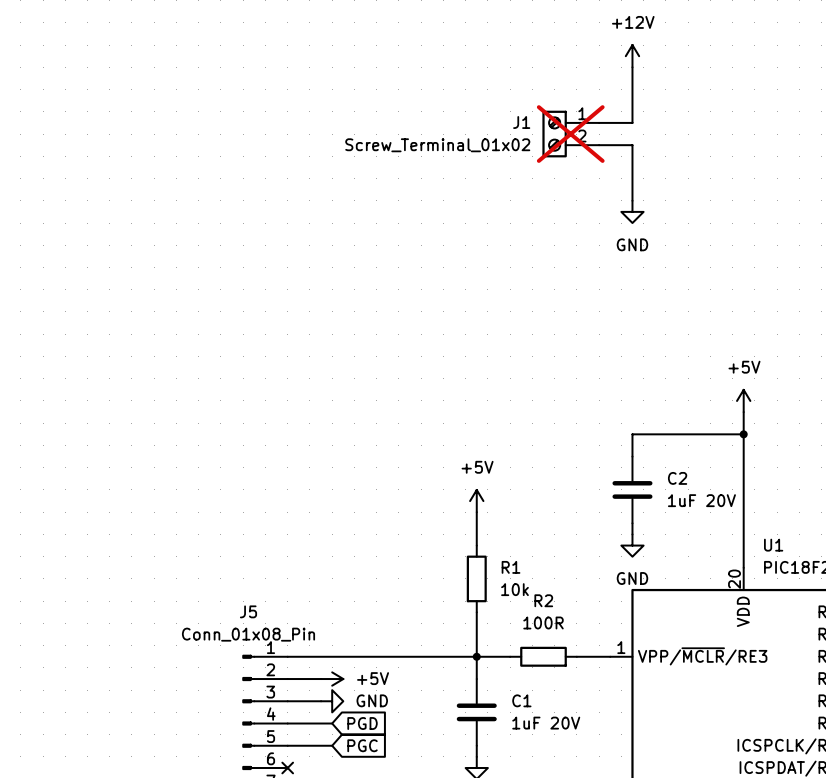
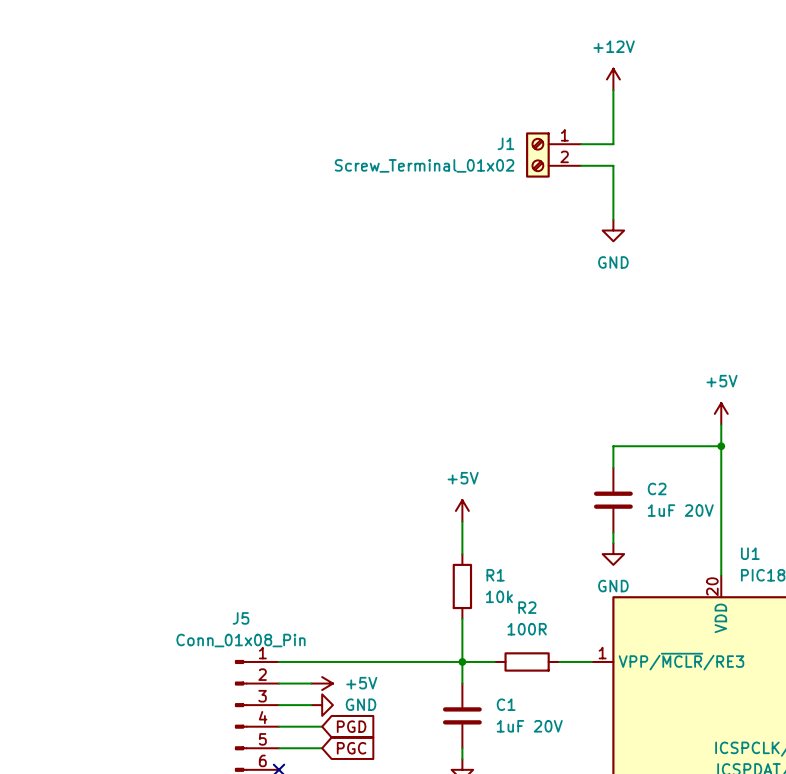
J1 do-not-place cross: (570, 134) -> none

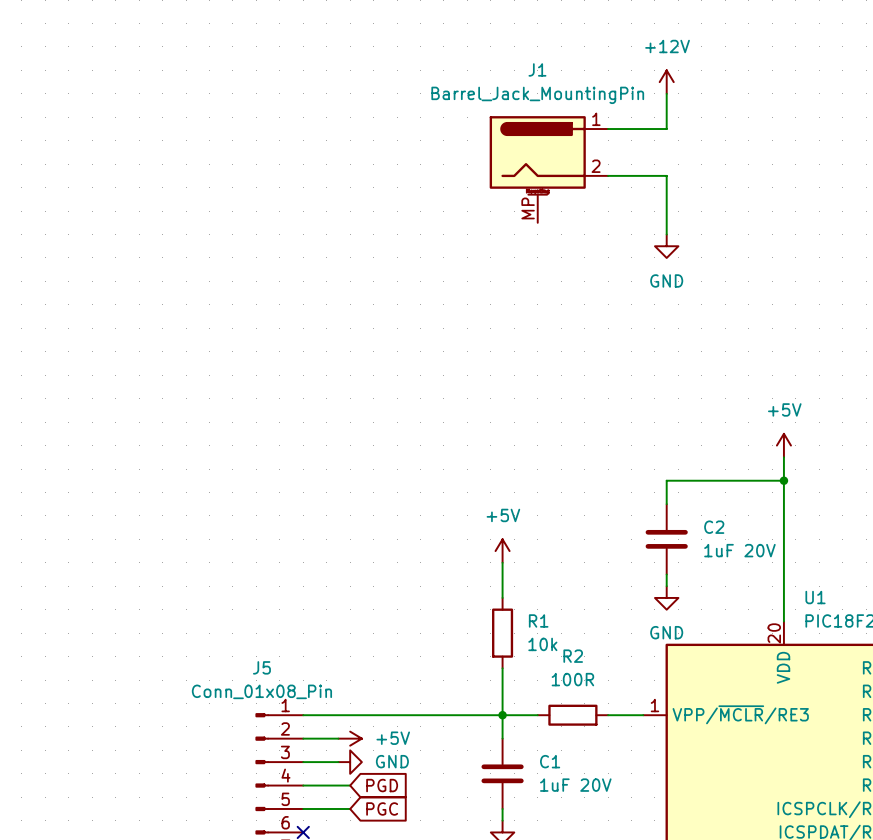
wire: (613, 122) (613, 144) (581, 144) -> (666, 129) (608, 129)
J1 symbol: [526, 132, 582, 178] -> [489, 116, 609, 223]
J1 name position: J1 (505, 143) -> J1 (537, 69)
J1 value: Screw_Terminal_01x02 (424, 165) -> Barrel_Jack_MountingPin (537, 95)

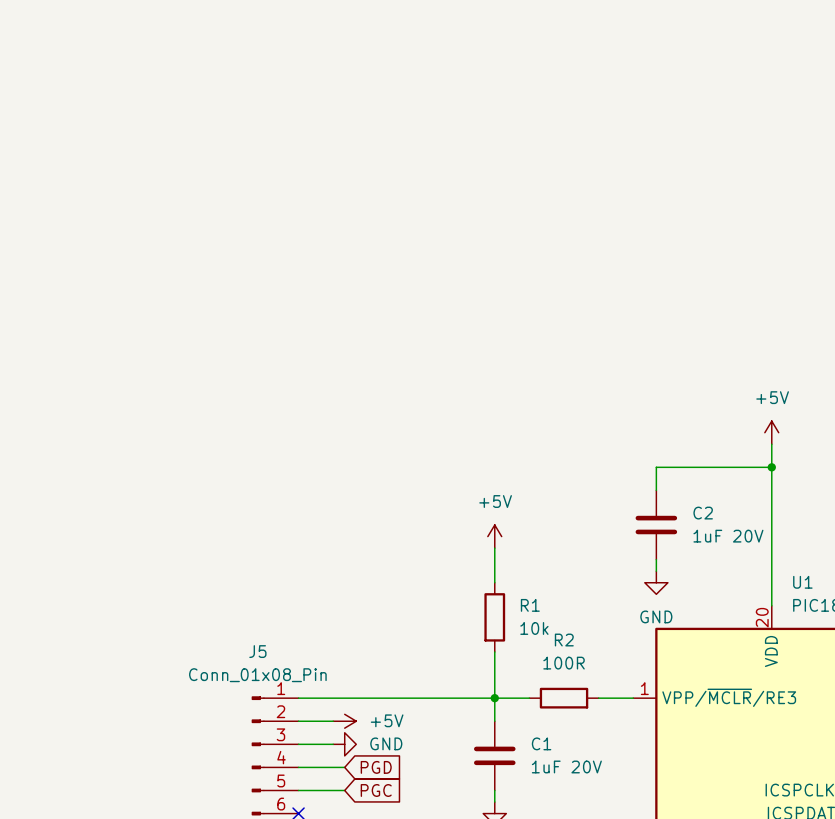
power symbol: +12V (666, 82) -> none
wire: (666, 93) (666, 129) (608, 129) -> none
J1: Barrel_Jack_MountingPin (548, 169) -> none
wire: (608, 175) (666, 175) (666, 234) -> none
power symbol: GND (666, 246) -> none

